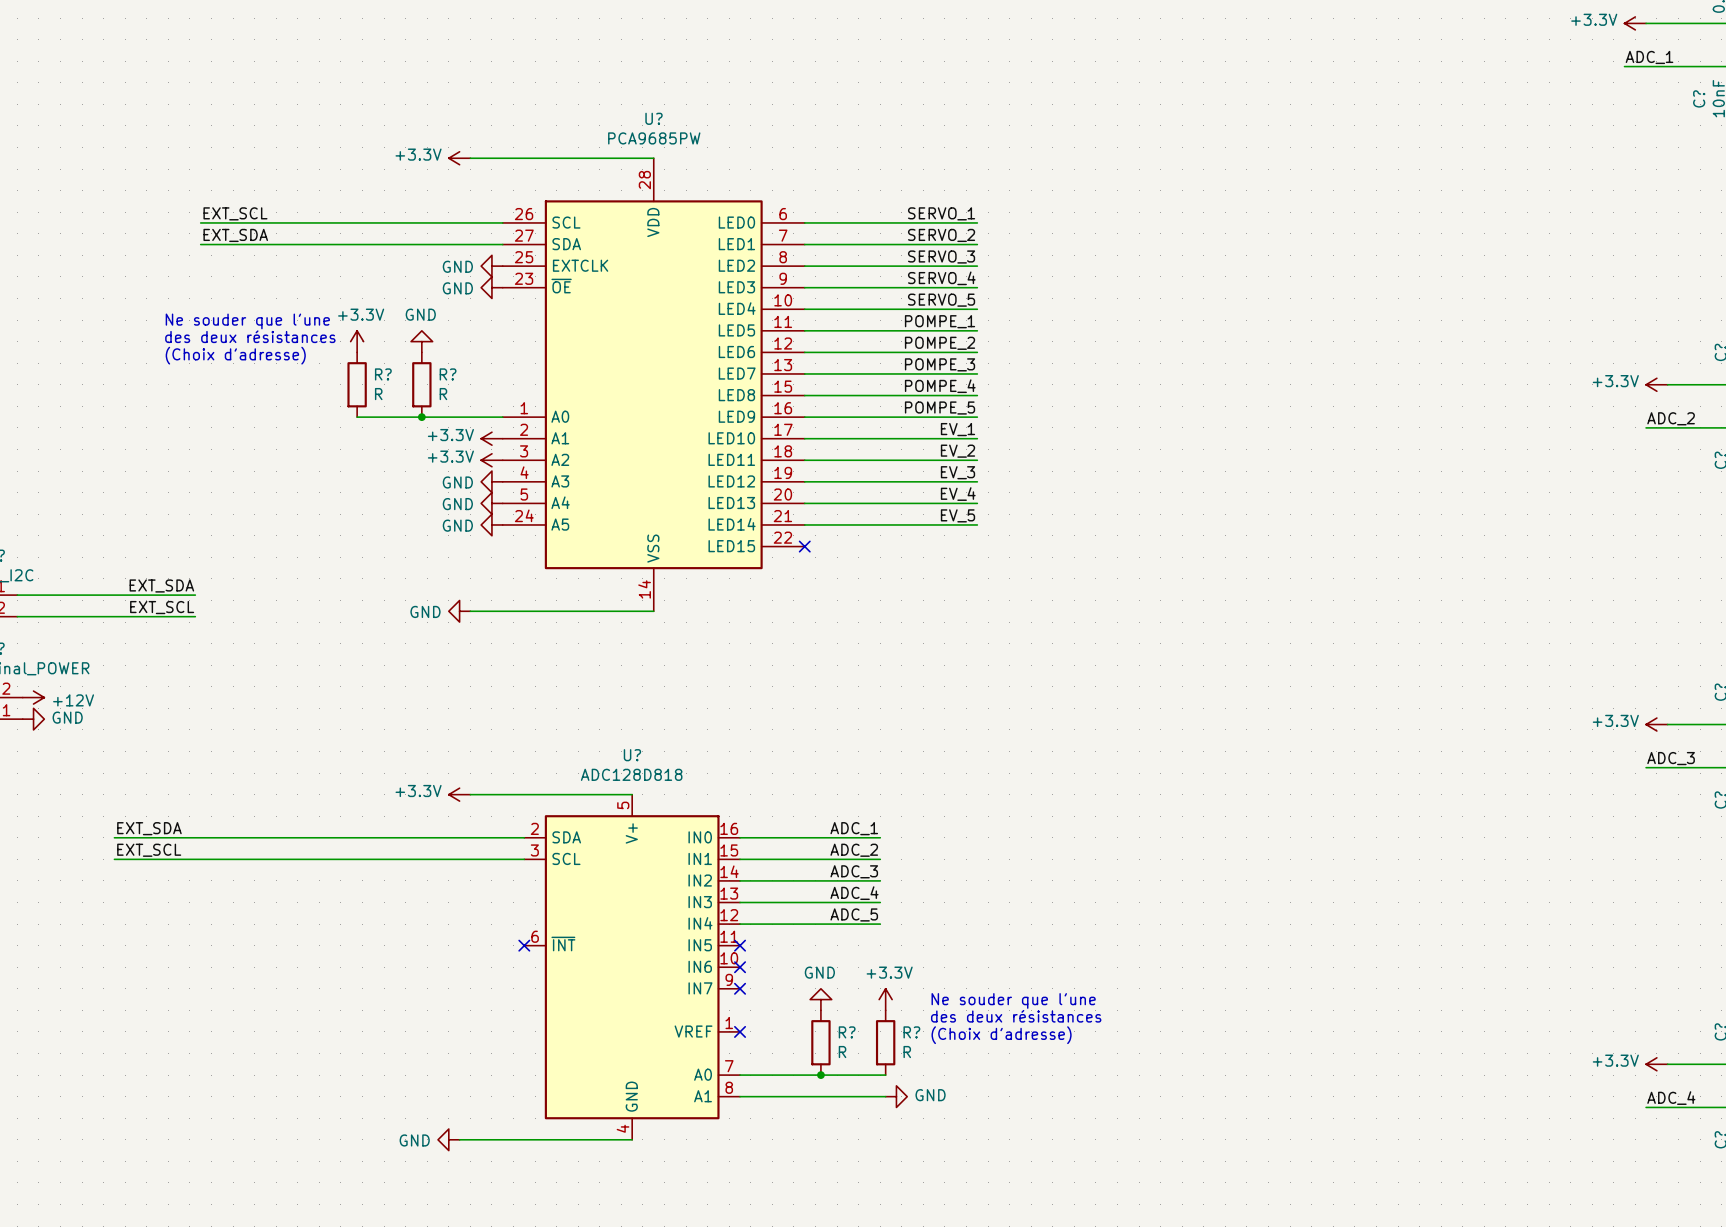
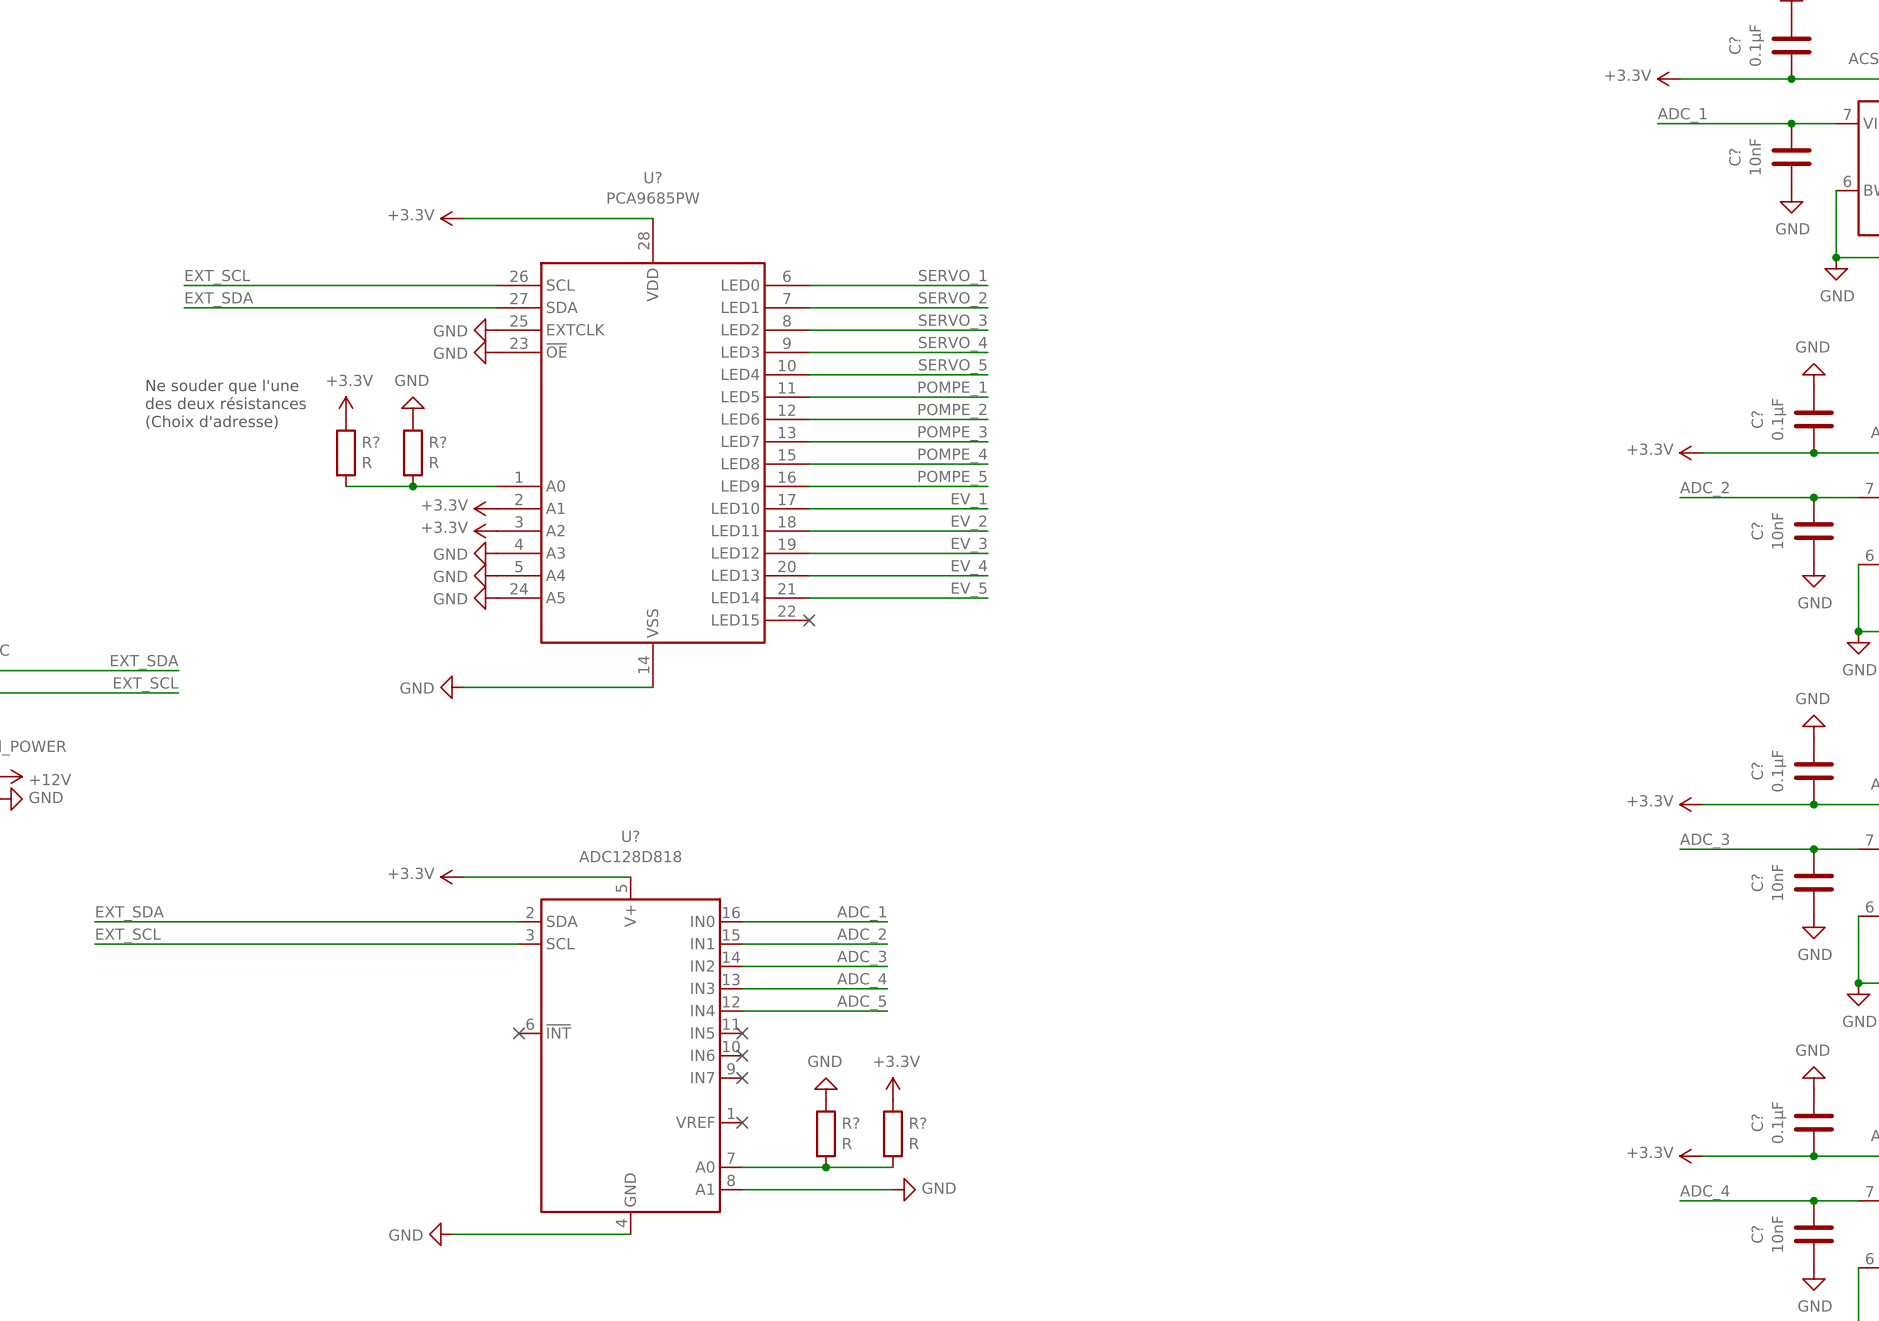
text: Ne souder que l'une (1013, 1000) -> none
text: des deux résistances (1016, 1016) -> none
text: (Choix d'adresse) (1001, 1035) -> none

